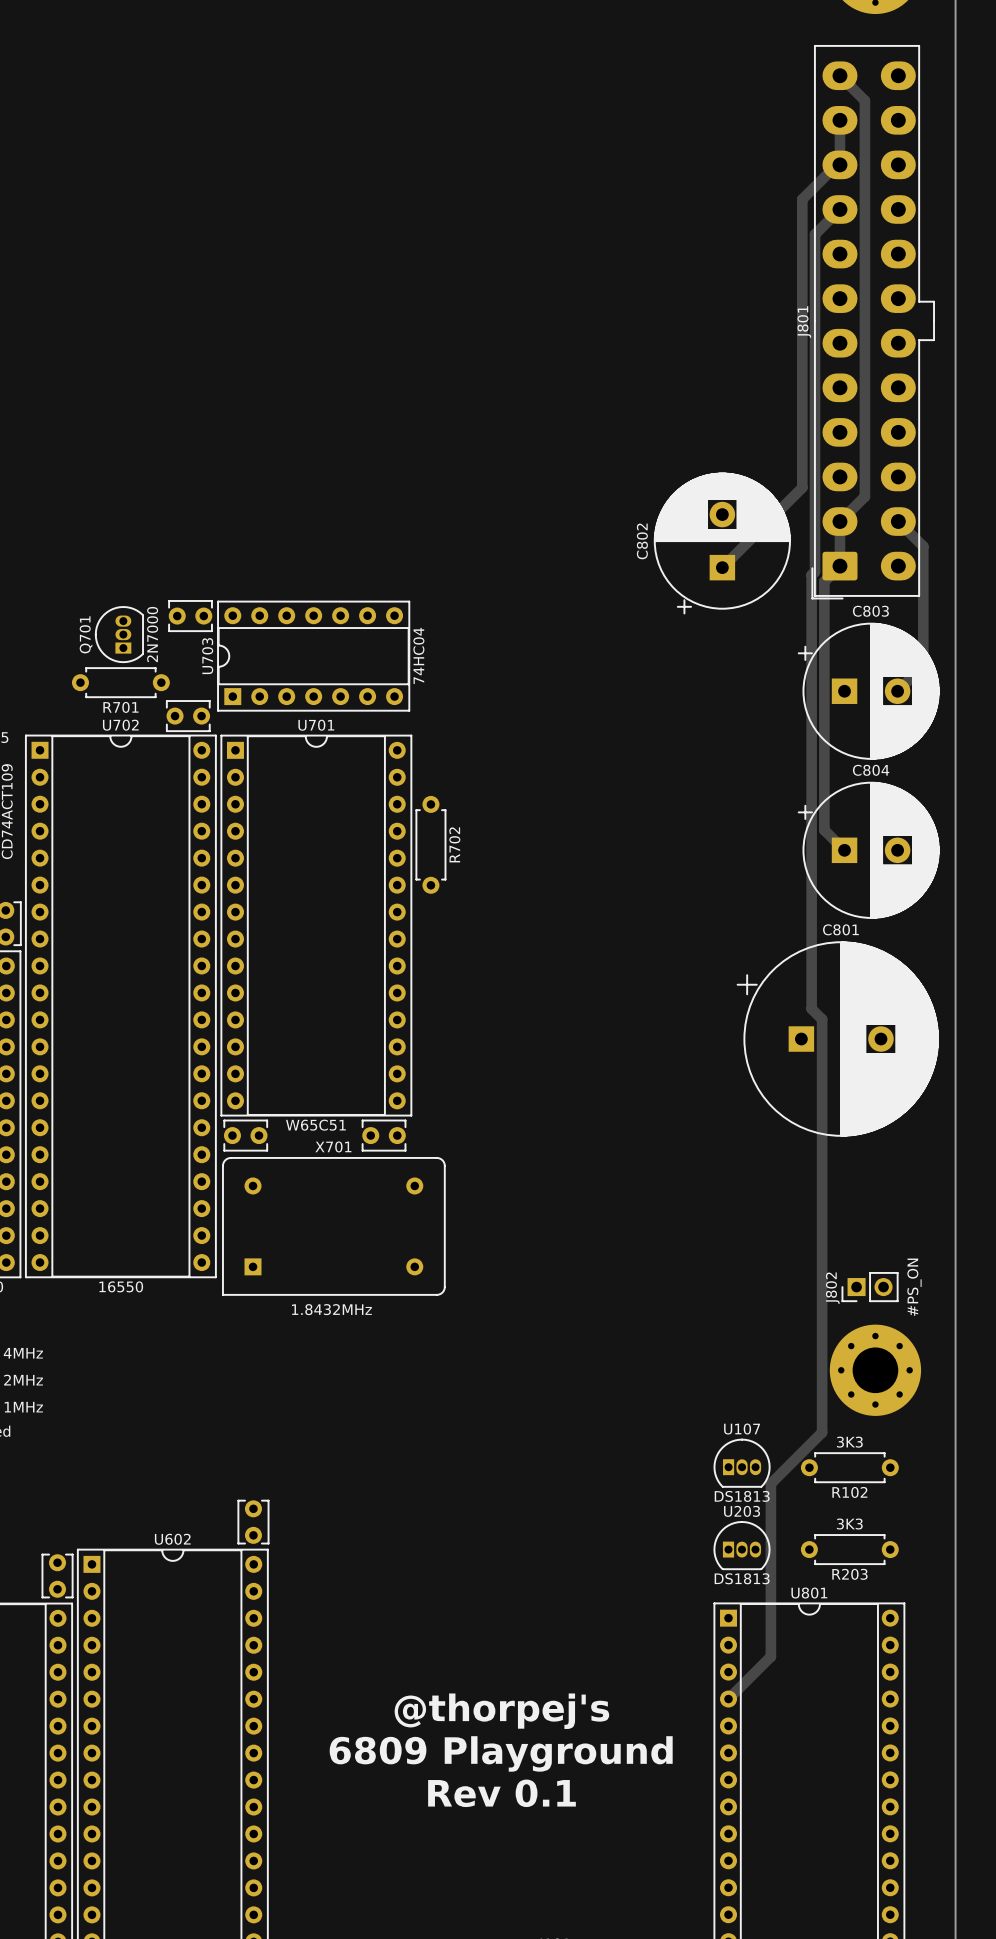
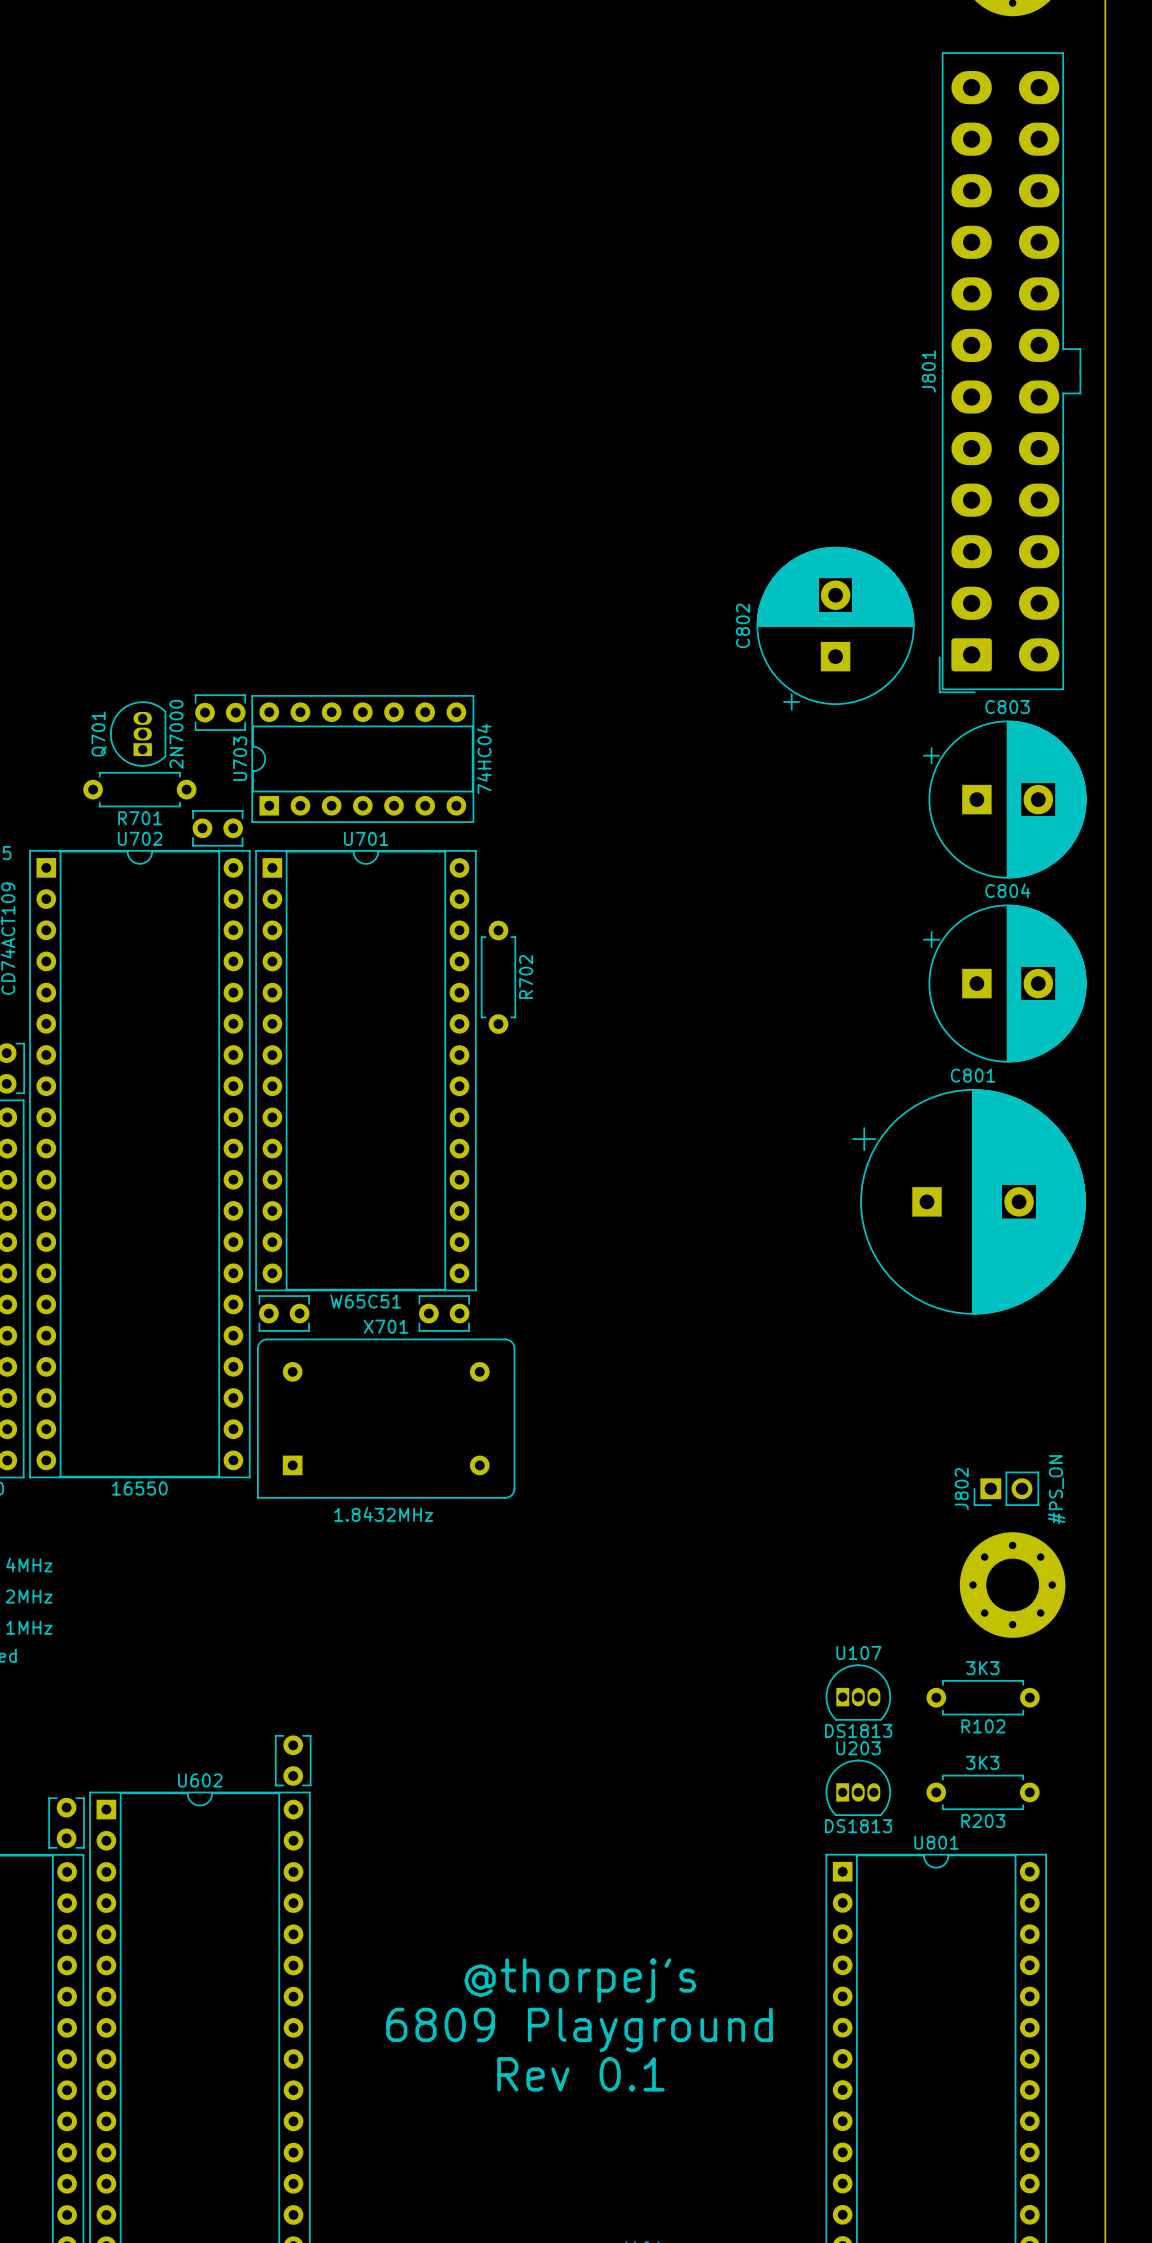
track: (839, 75) (864, 100) (864, 496) (839, 521) (839, 566) (824, 581) (824, 830) (844, 850) -> none
track: (839, 120) (839, 164) (836, 164) (802, 199) (802, 487) (722, 567) -> none
track: (839, 209) (815, 234) (815, 571) (811, 575) (811, 1008) (822, 1019) (822, 1432) (770, 1483) (770, 1656) (728, 1699) -> none
track: (898, 521) (923, 546) (923, 665) (897, 691) -> none

